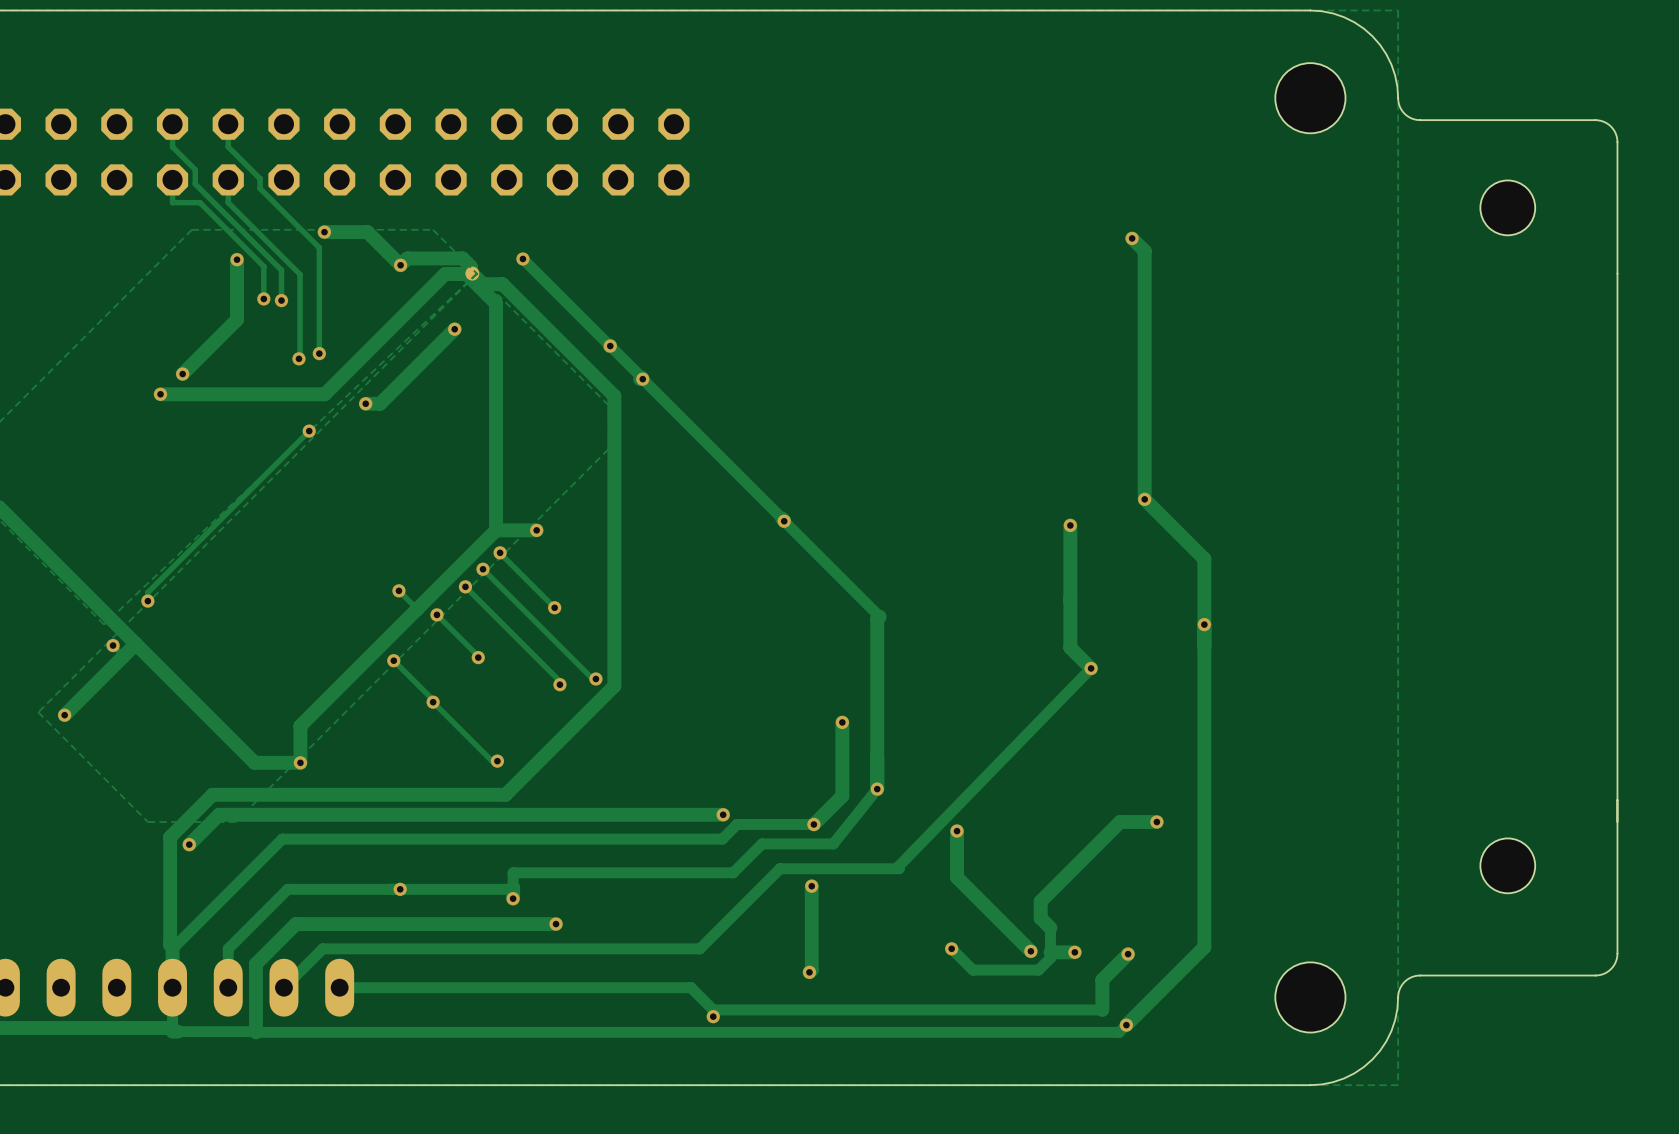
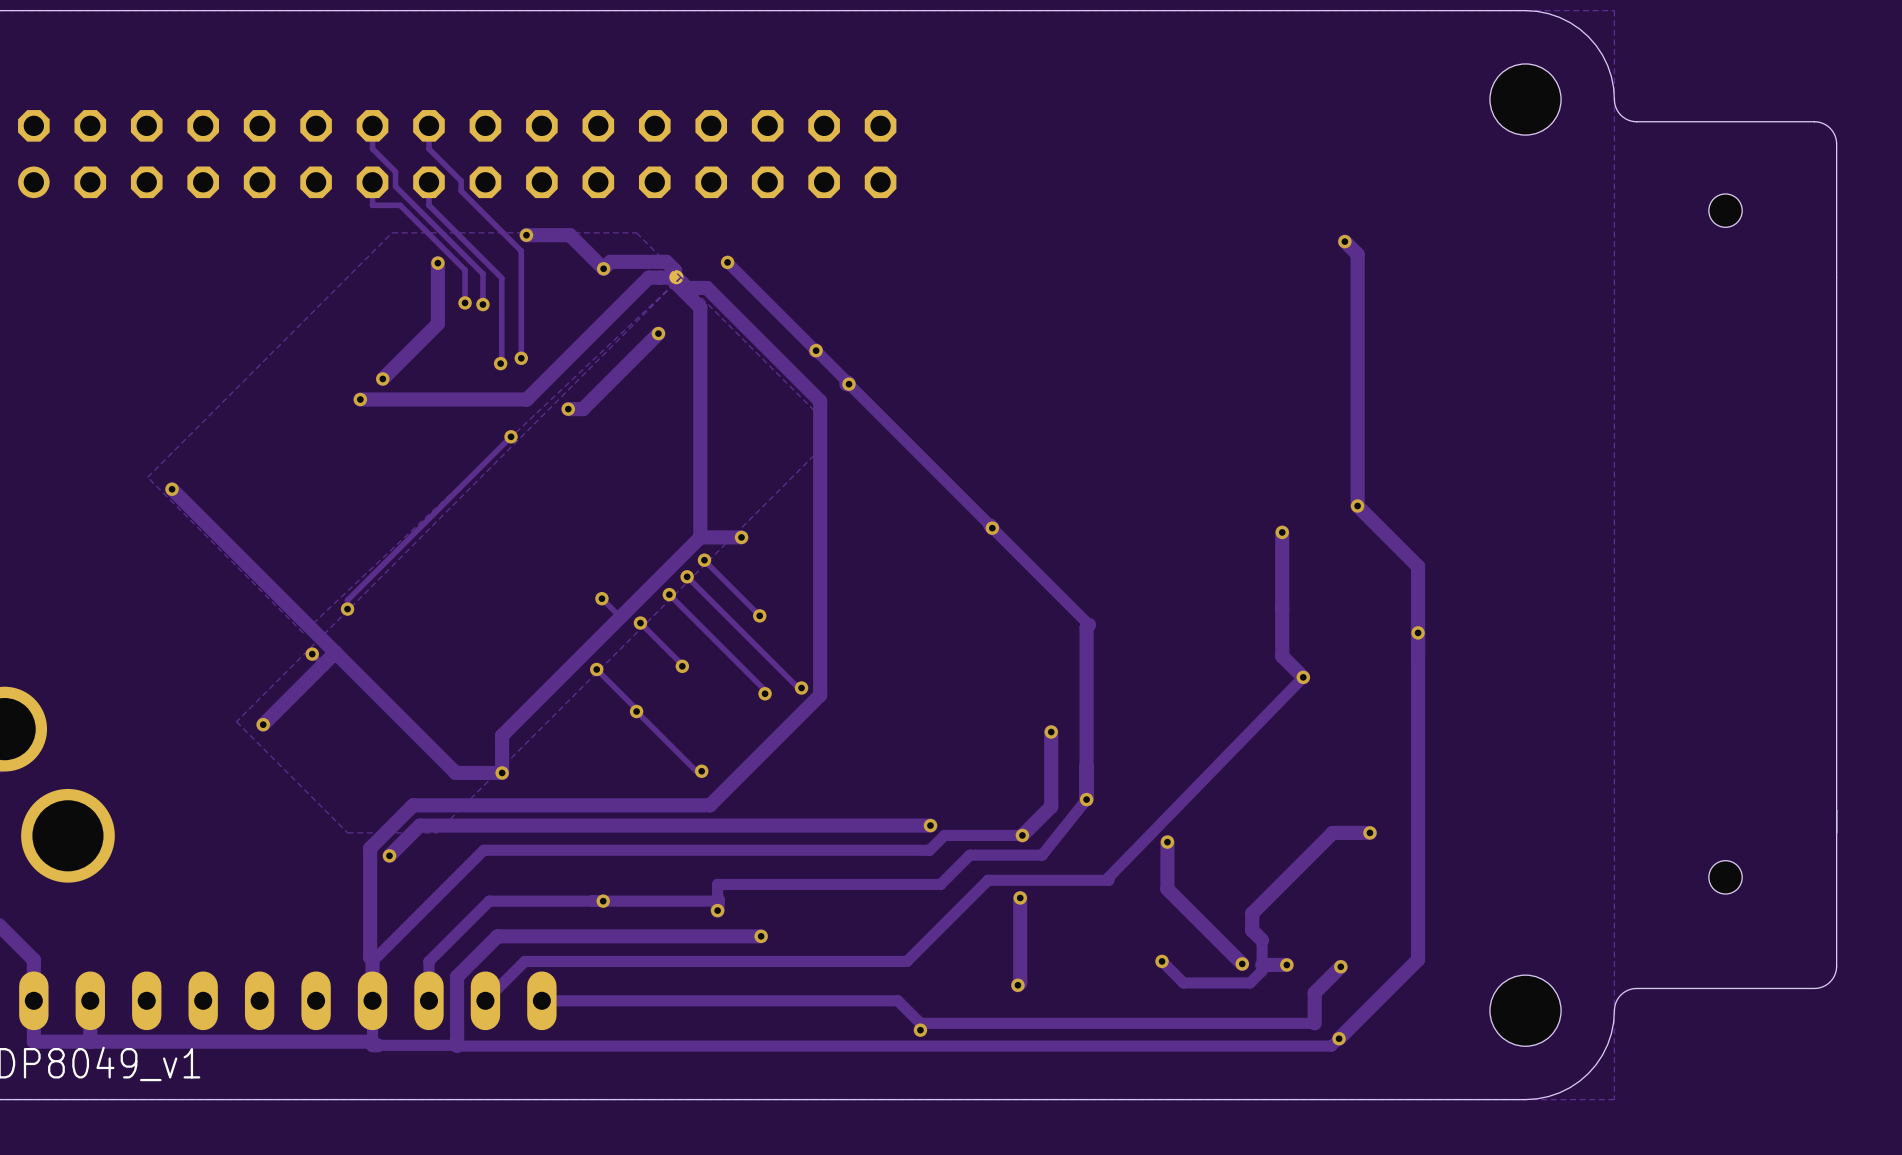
hole size: [1480, 180, 1536, 236] -> [1708, 193, 1743, 228]
hole size: [1480, 838, 1536, 894] -> [1708, 860, 1743, 895]

